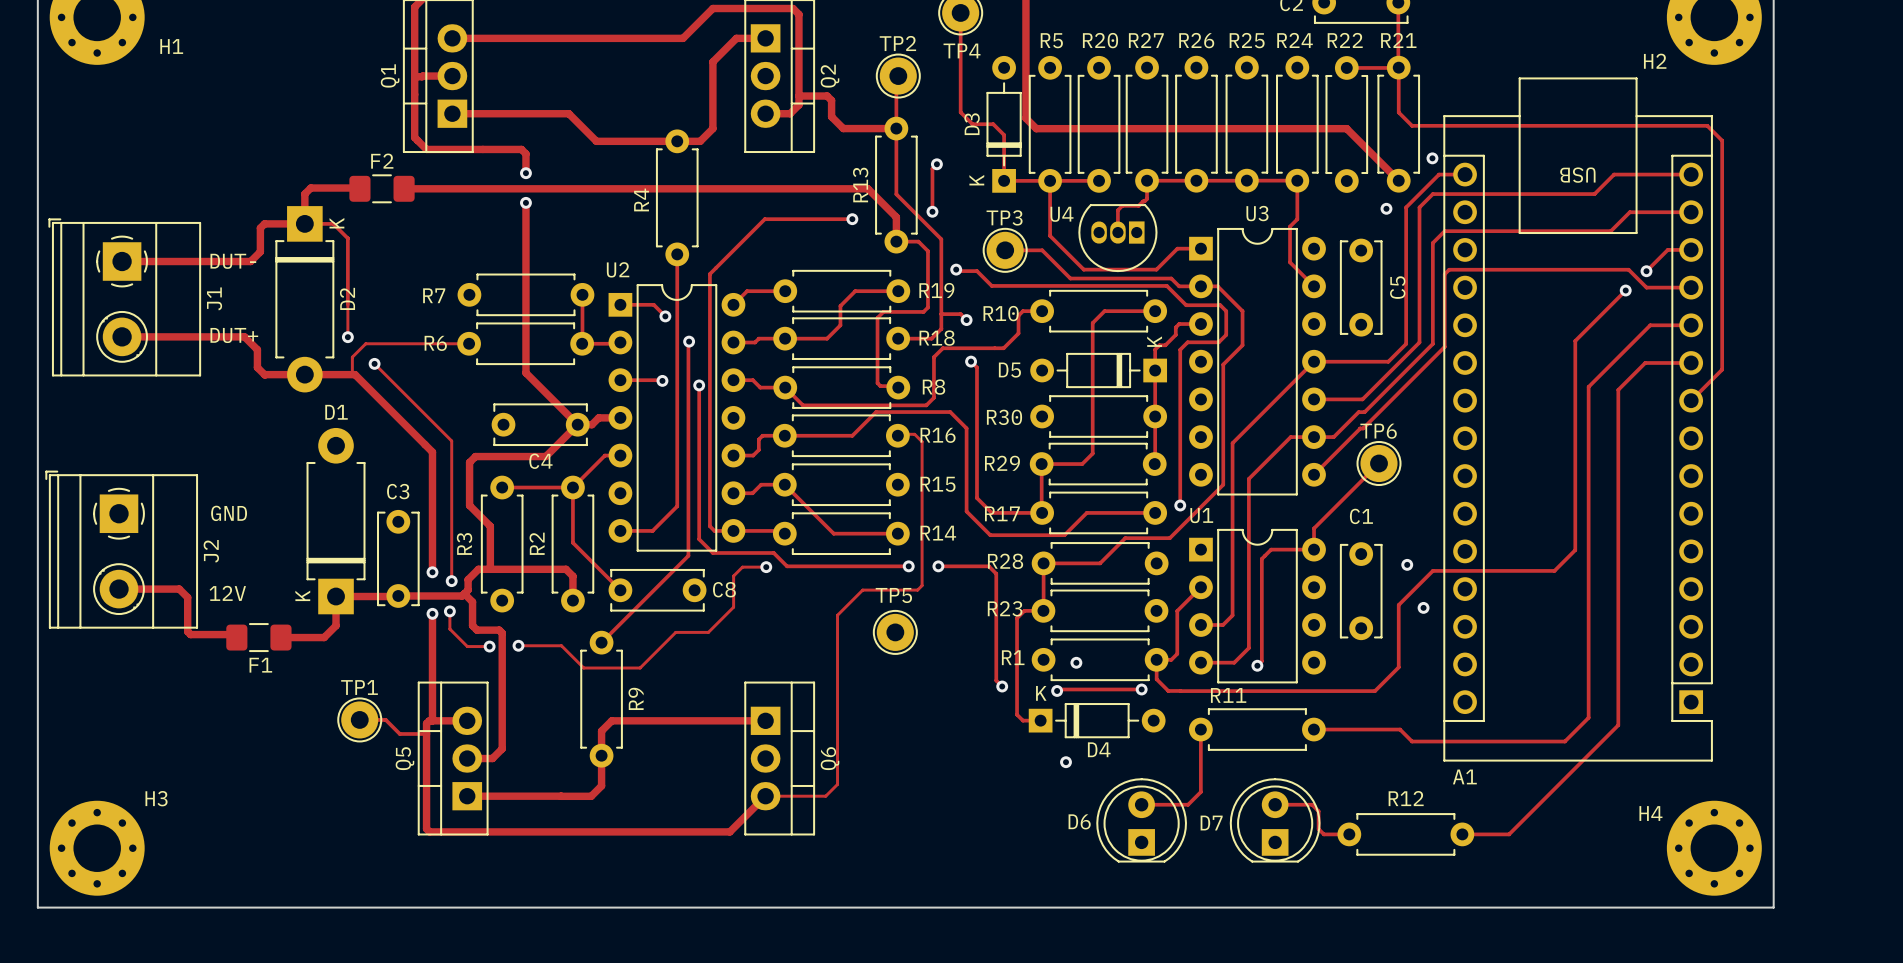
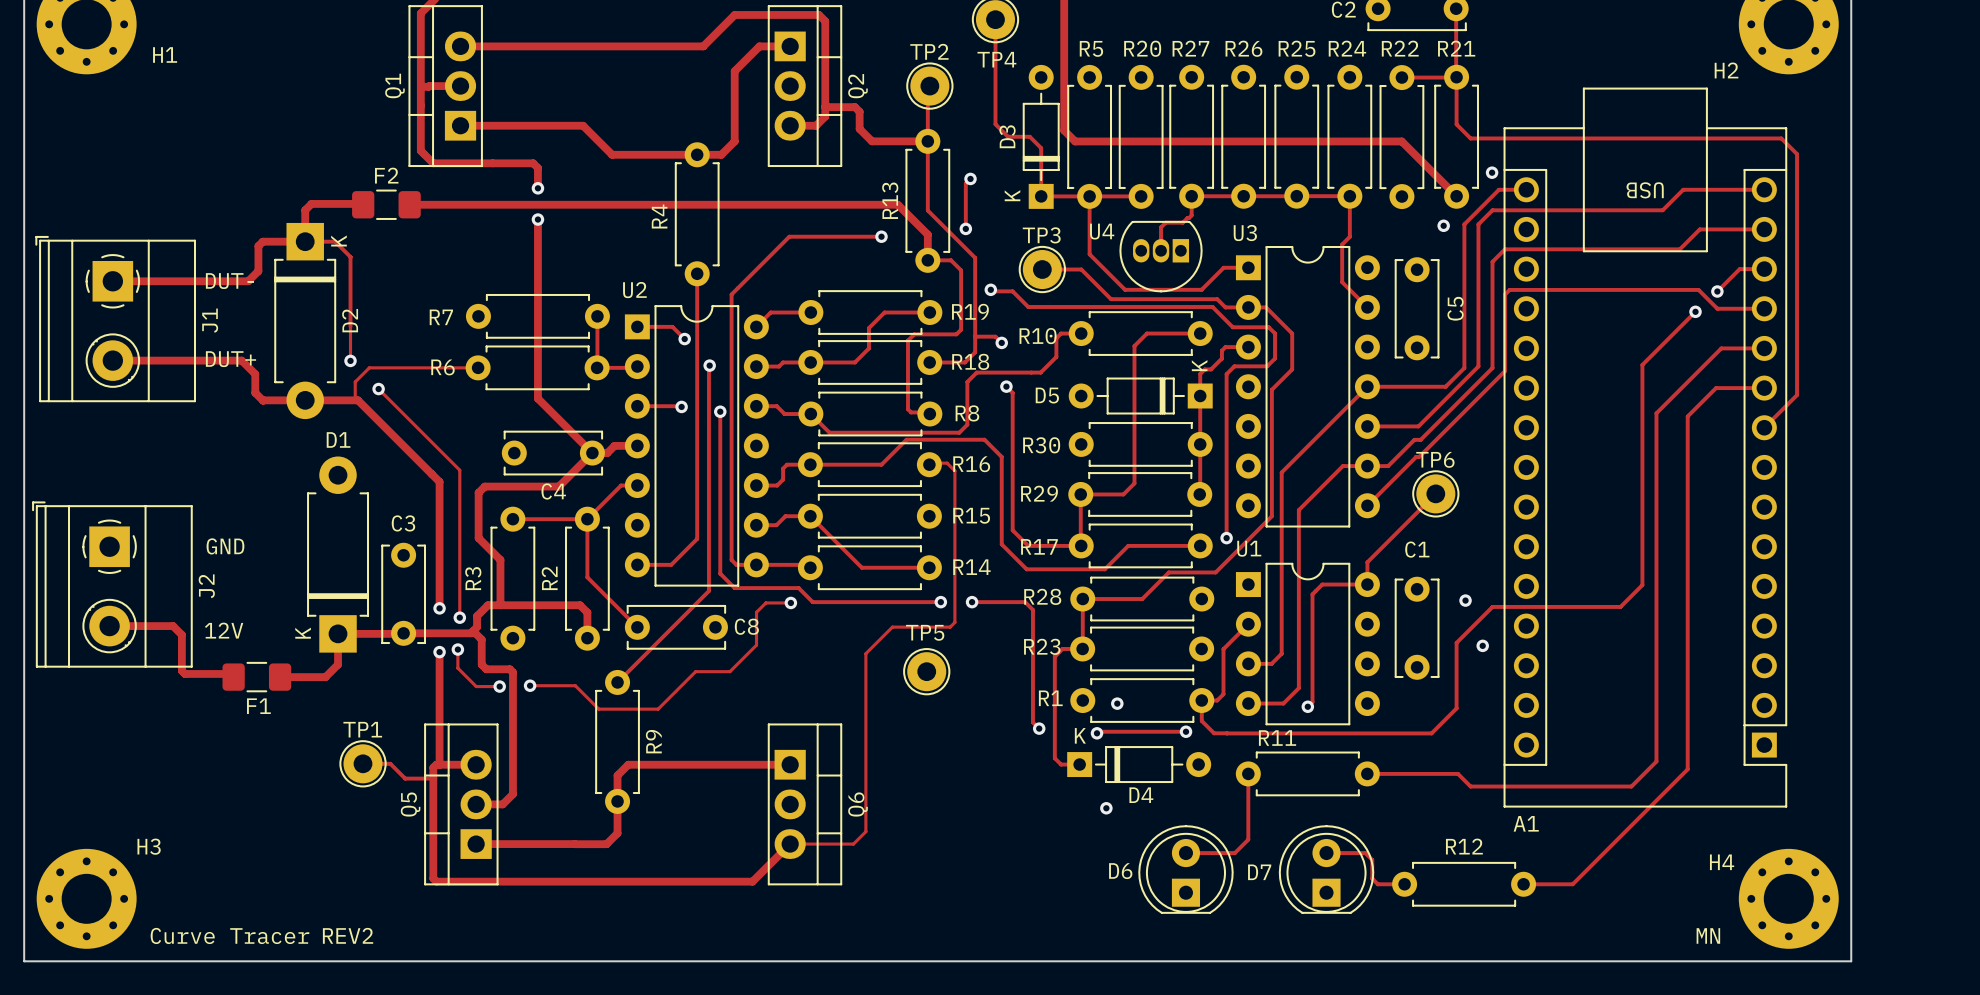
U3 name position: U3 (1257, 213) -> U3 (1245, 233)
text: none -> Curve Tracer (229, 935)
text: none -> REV2 (348, 935)
text: none -> MN (1708, 935)

